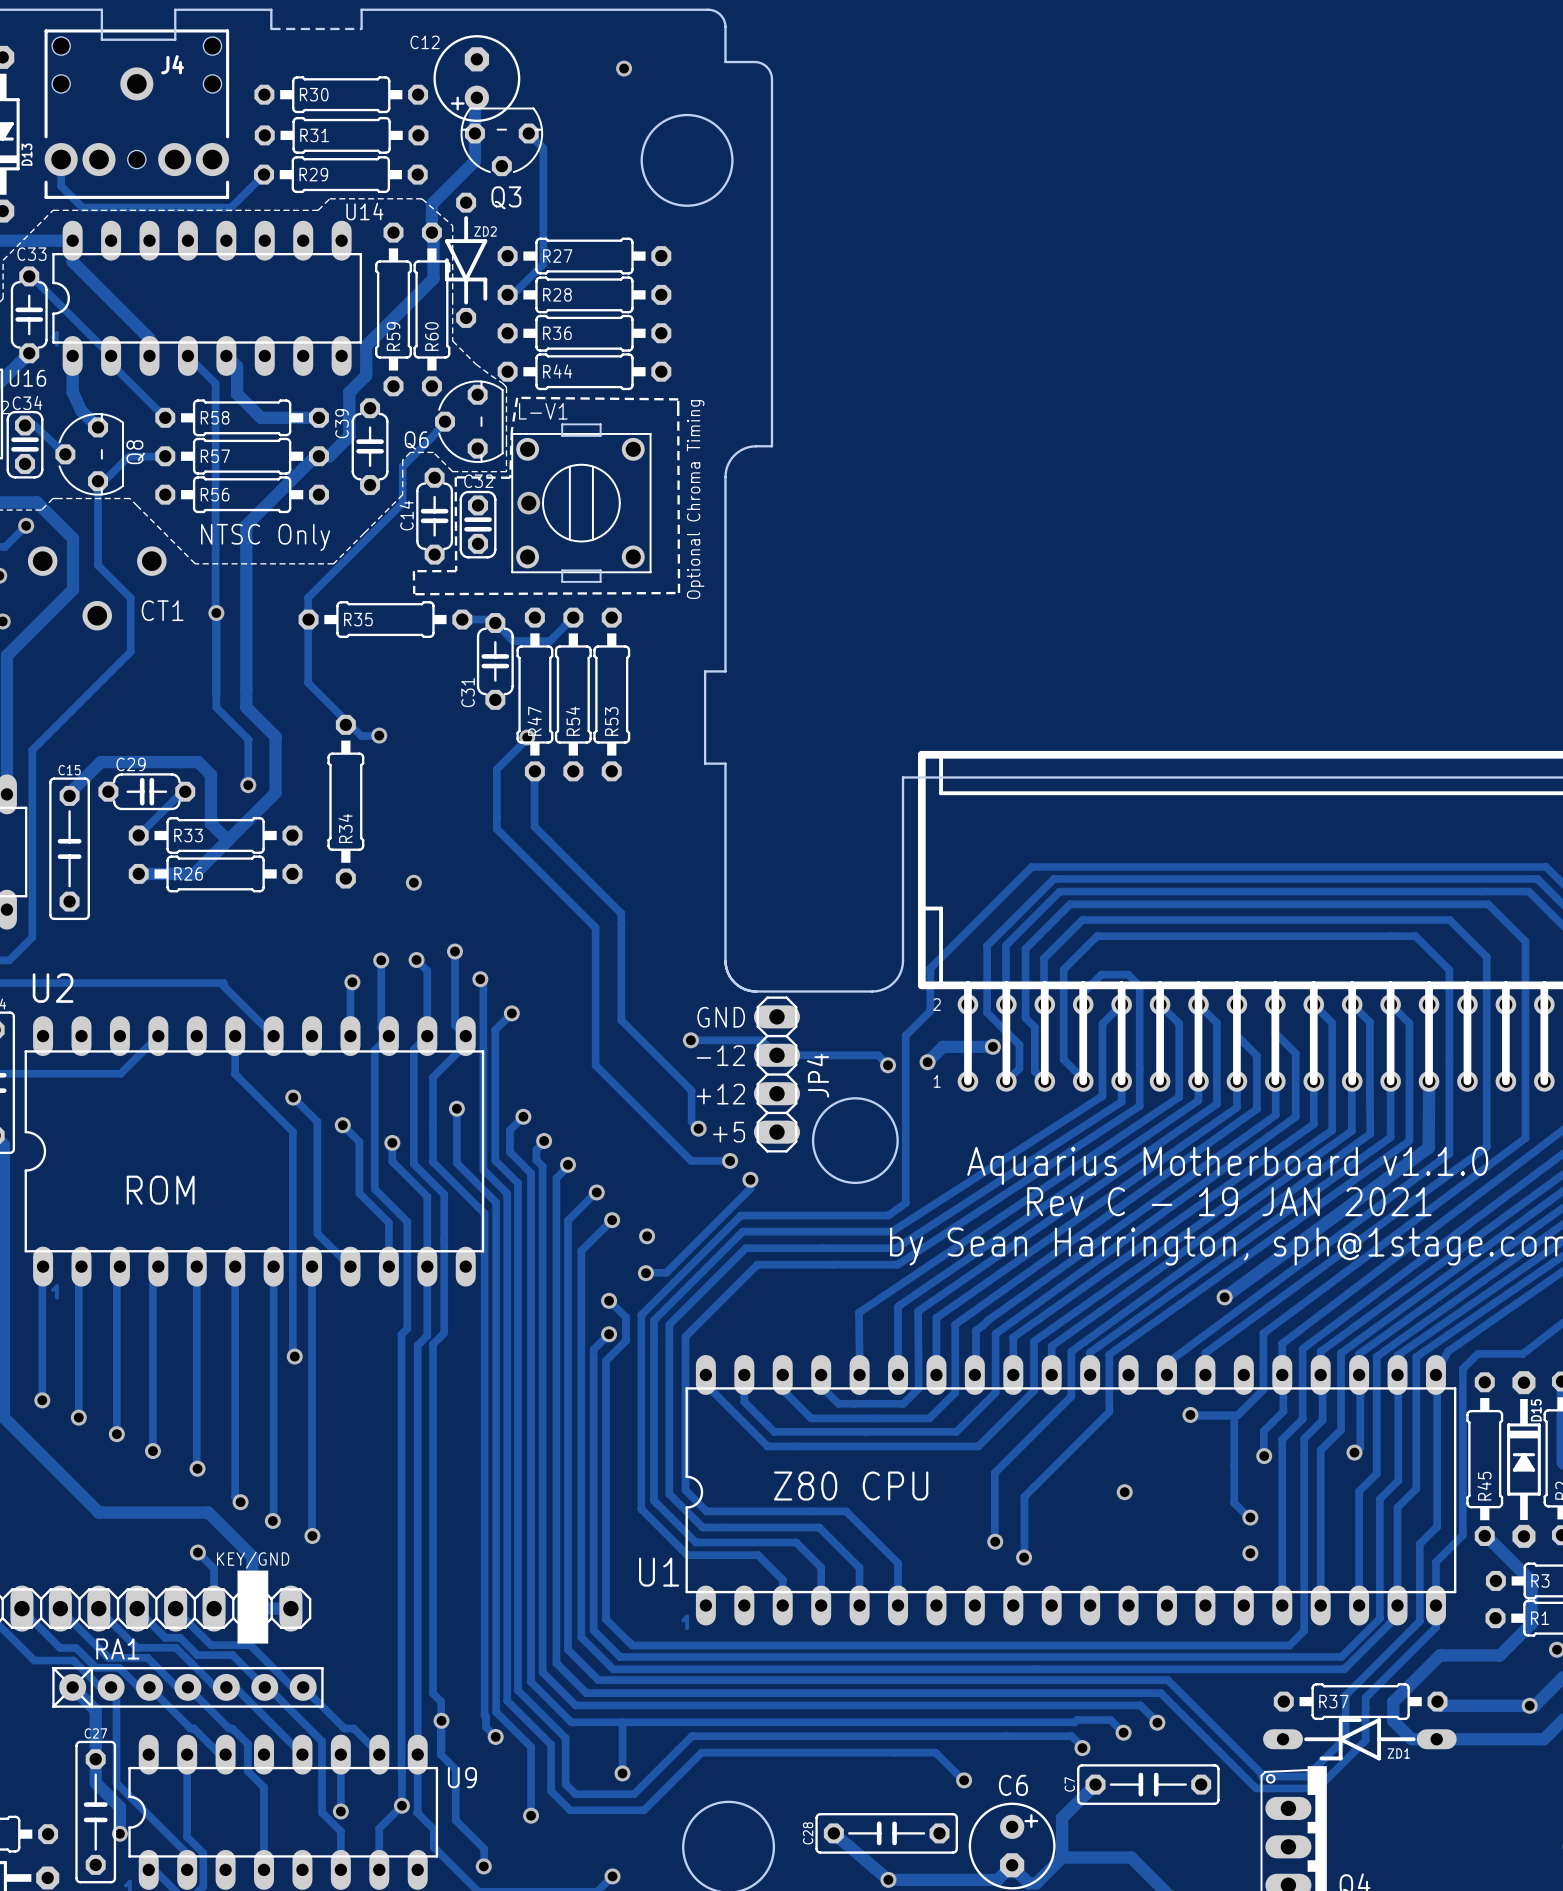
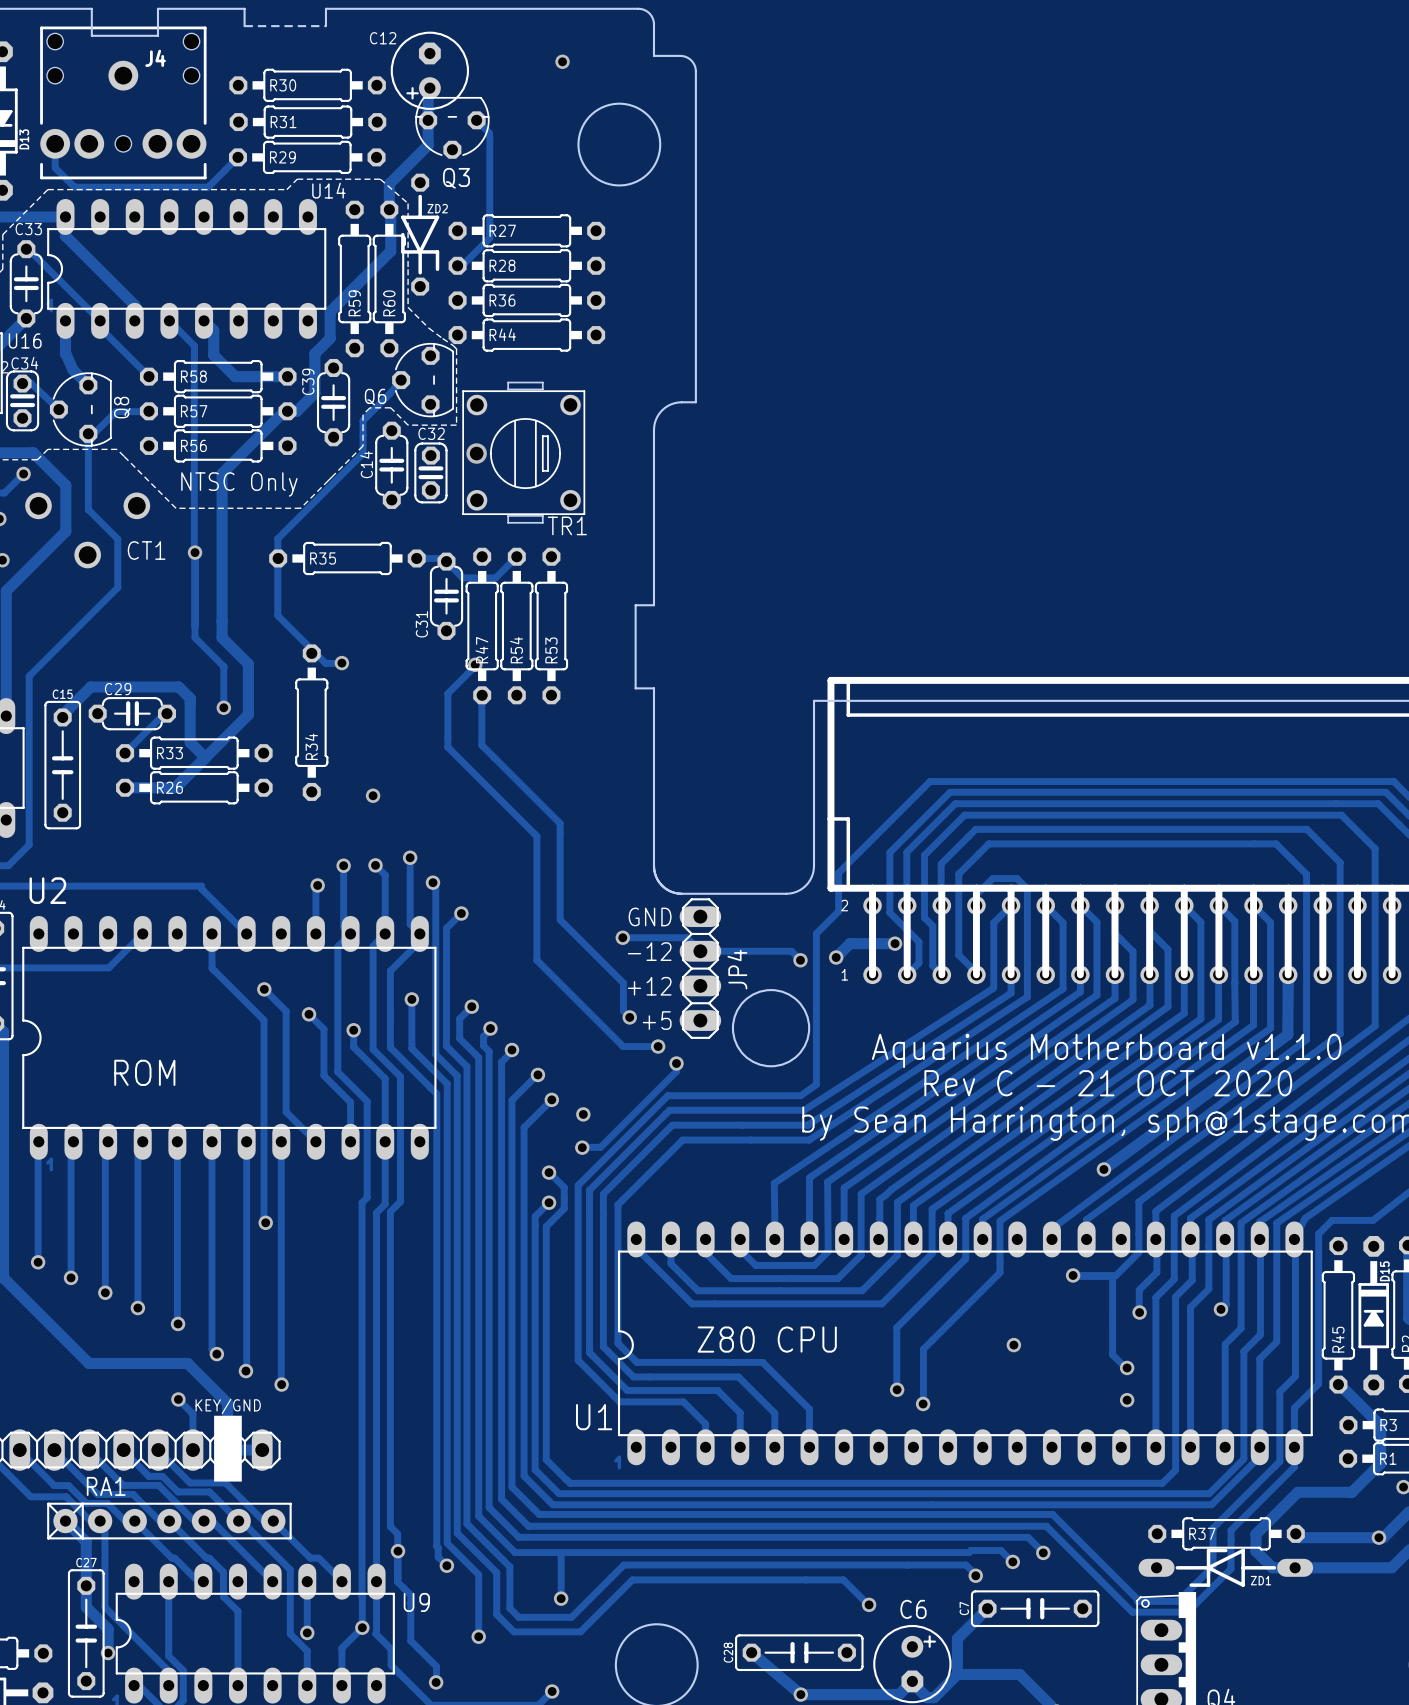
text: Optional Chroma Timing (695, 499) -> none
TR1: none -> (523, 452)
L-V1: (581, 503) -> none
line: (414, 593) (413, 571) (456, 571) (455, 477) (510, 477) (511, 430) (517, 397) (678, 399) (679, 593) (415, 594) -> none
text: Rev C - 19 JAN 2021 (1229, 1201) -> Rev C - 21 OCT 2020 (1108, 1083)

